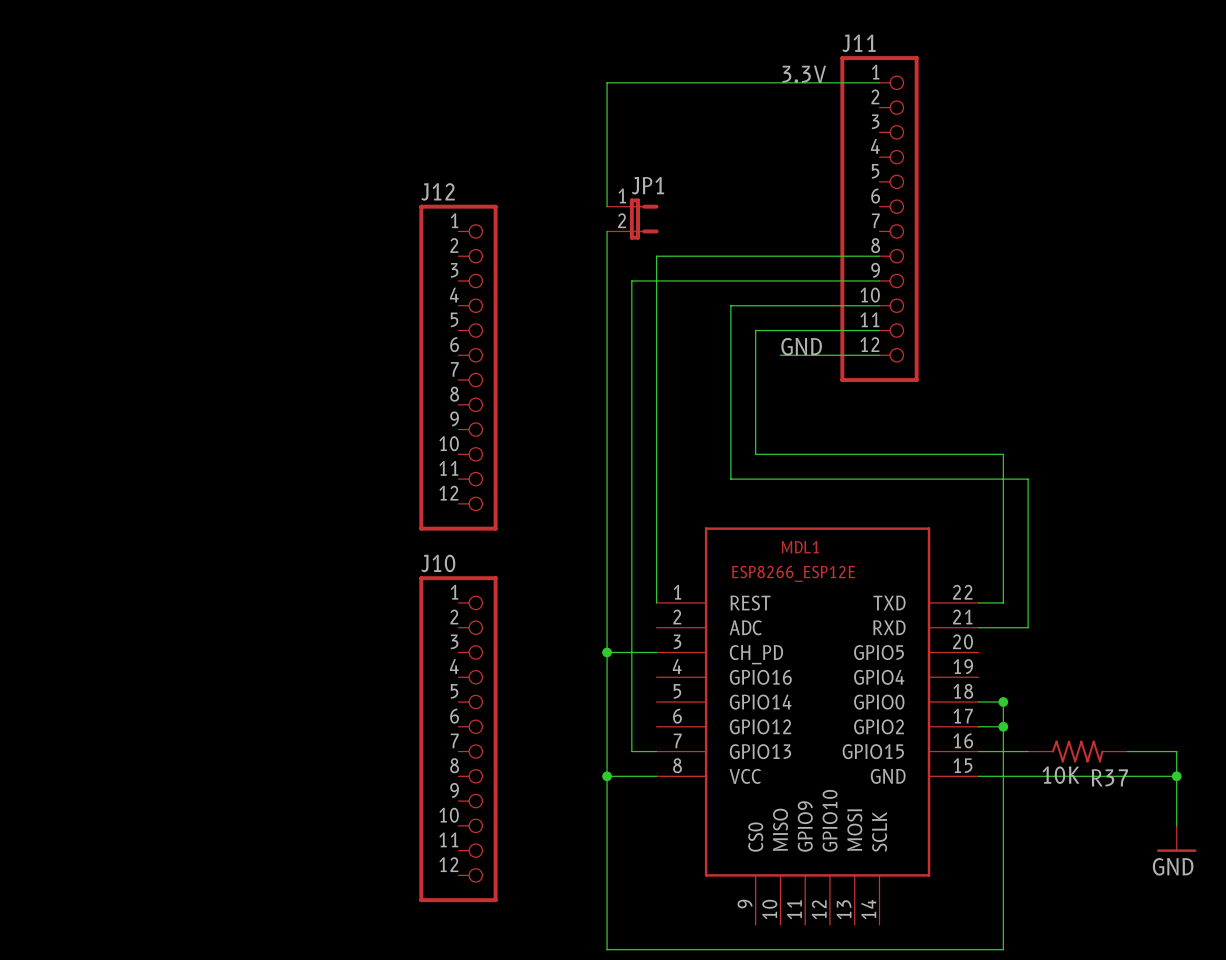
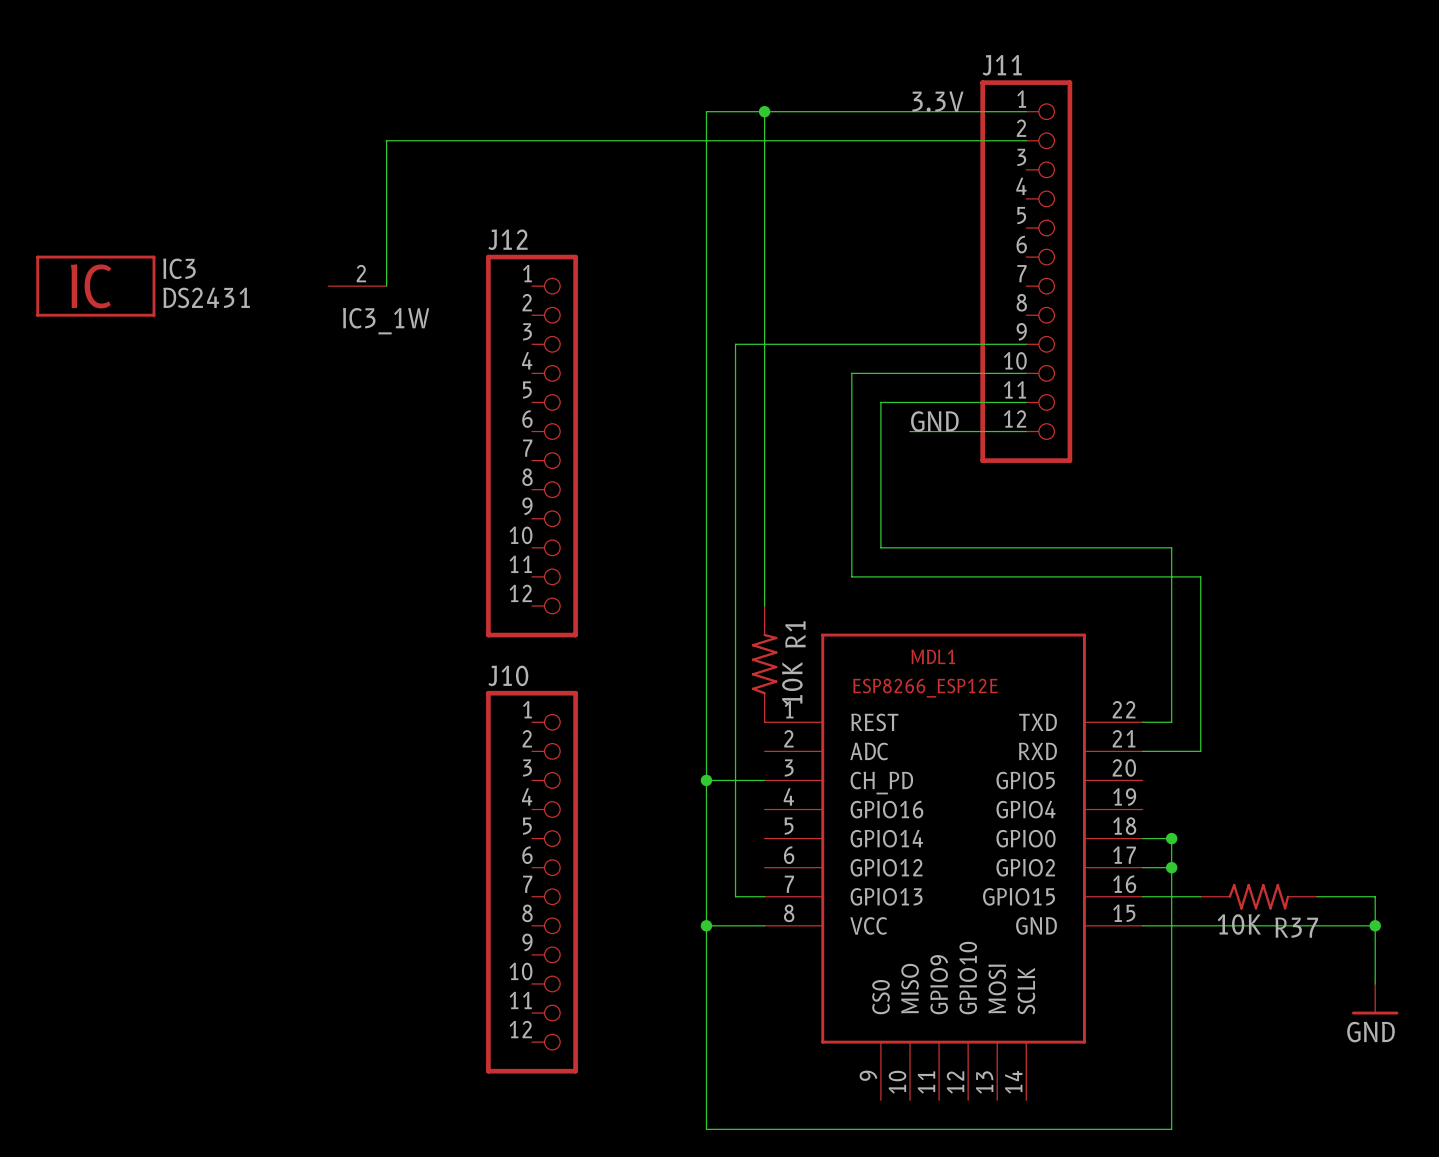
junction: none -> (764, 111)
wire: none -> (1026, 140) (386, 140) (386, 286)
wire: none -> (706, 257) (706, 286)
JP1: (632, 219) -> none
IC3: none -> DS2431 (95, 286)
IC3_1W: none -> (357, 286)
wire: (656, 256) (879, 256) -> (764, 315) (764, 111)
R1: none -> 10K (764, 664)

